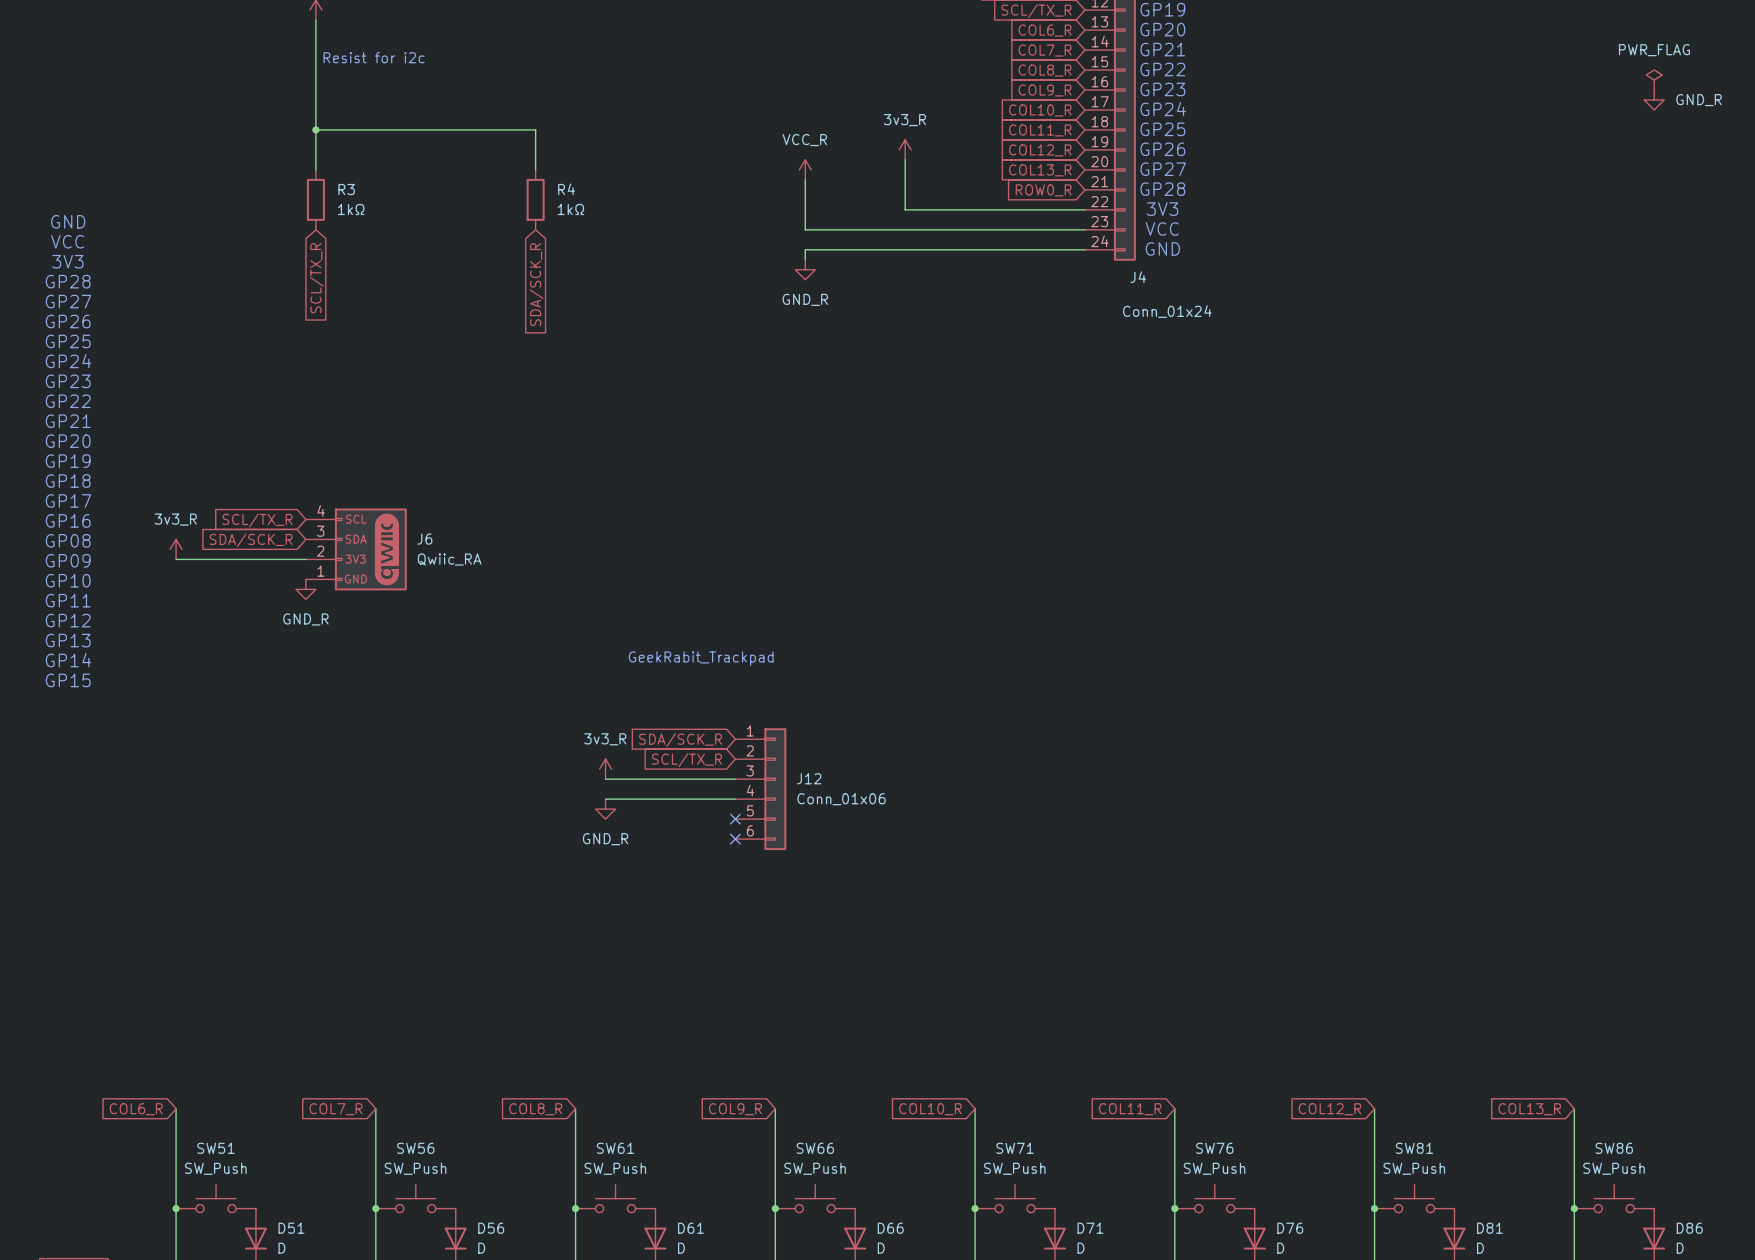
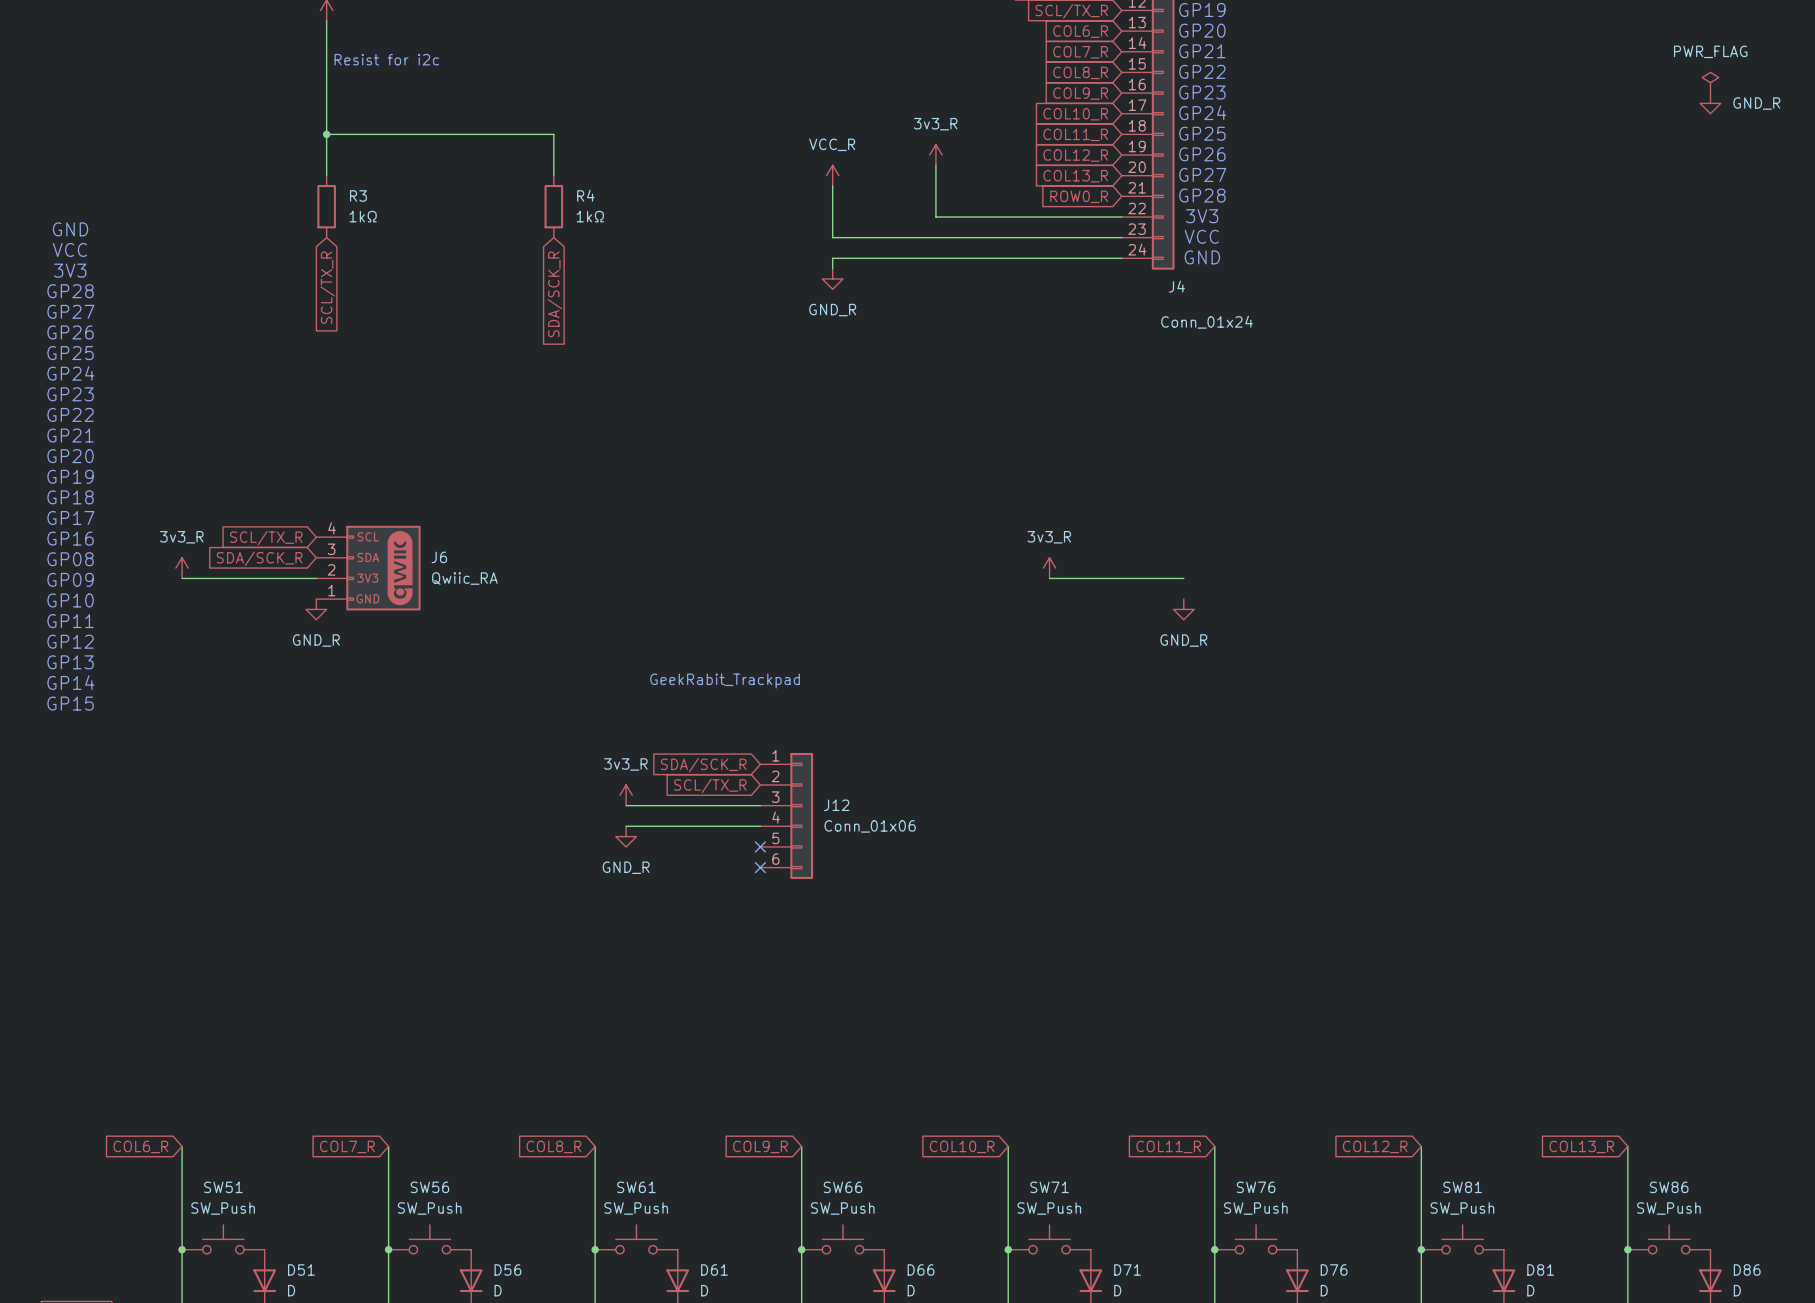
power symbol: none -> 3v3_R (1049, 568)
wire: none -> (1049, 578) (1183, 578)
power symbol: none -> GND_R (1183, 609)

